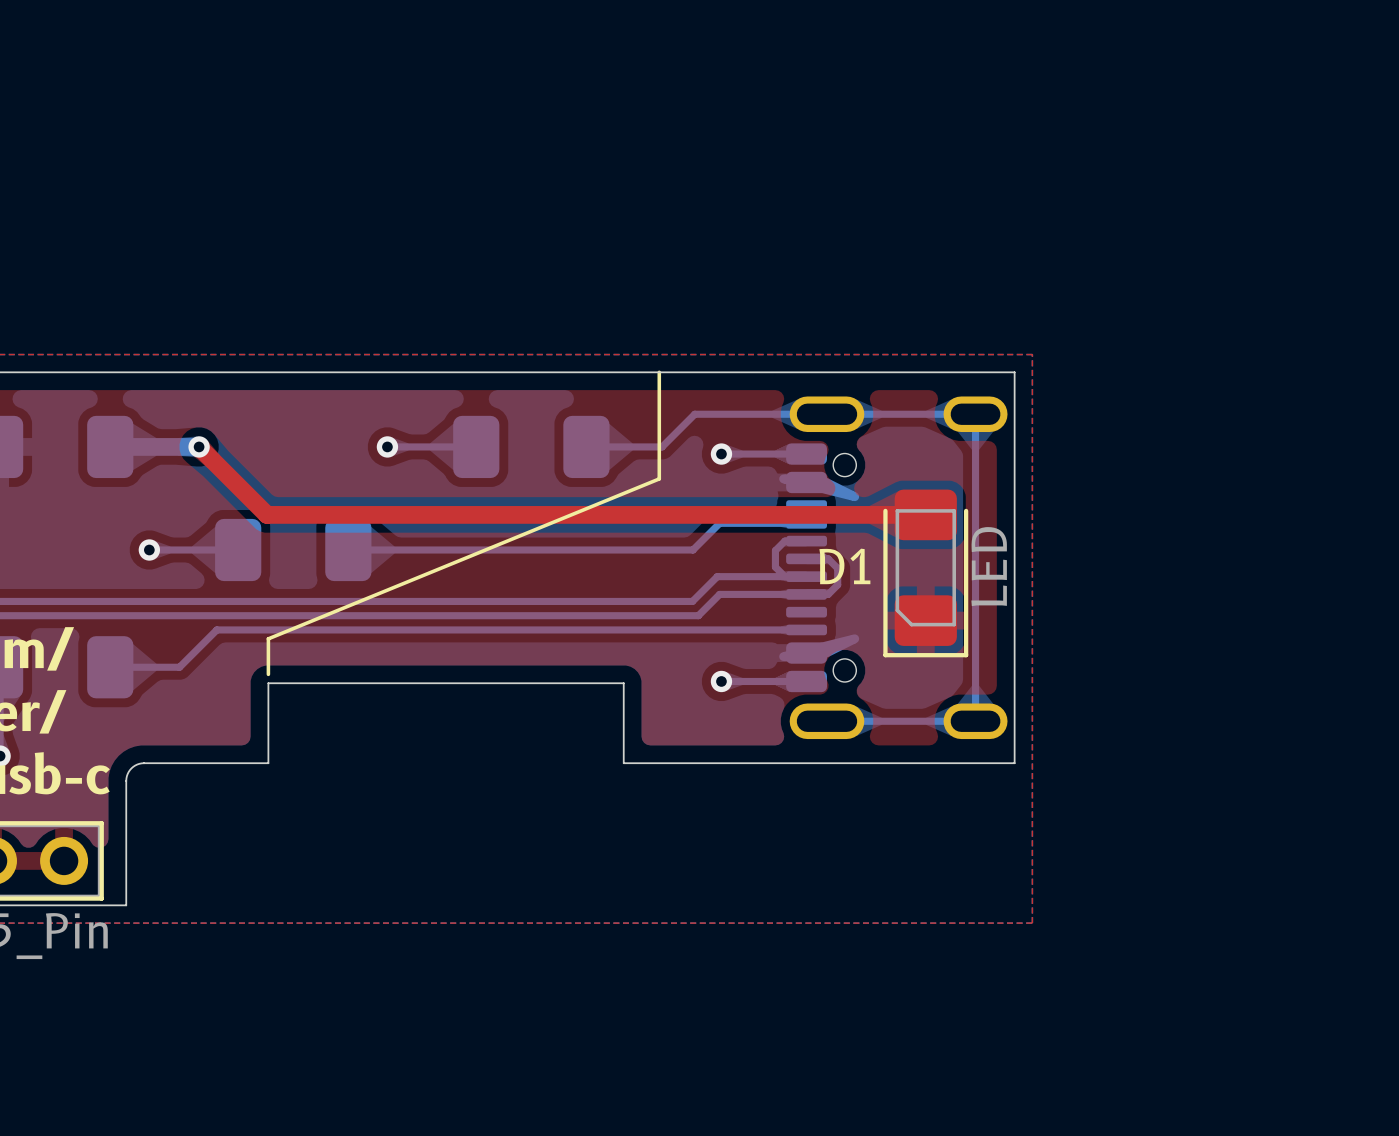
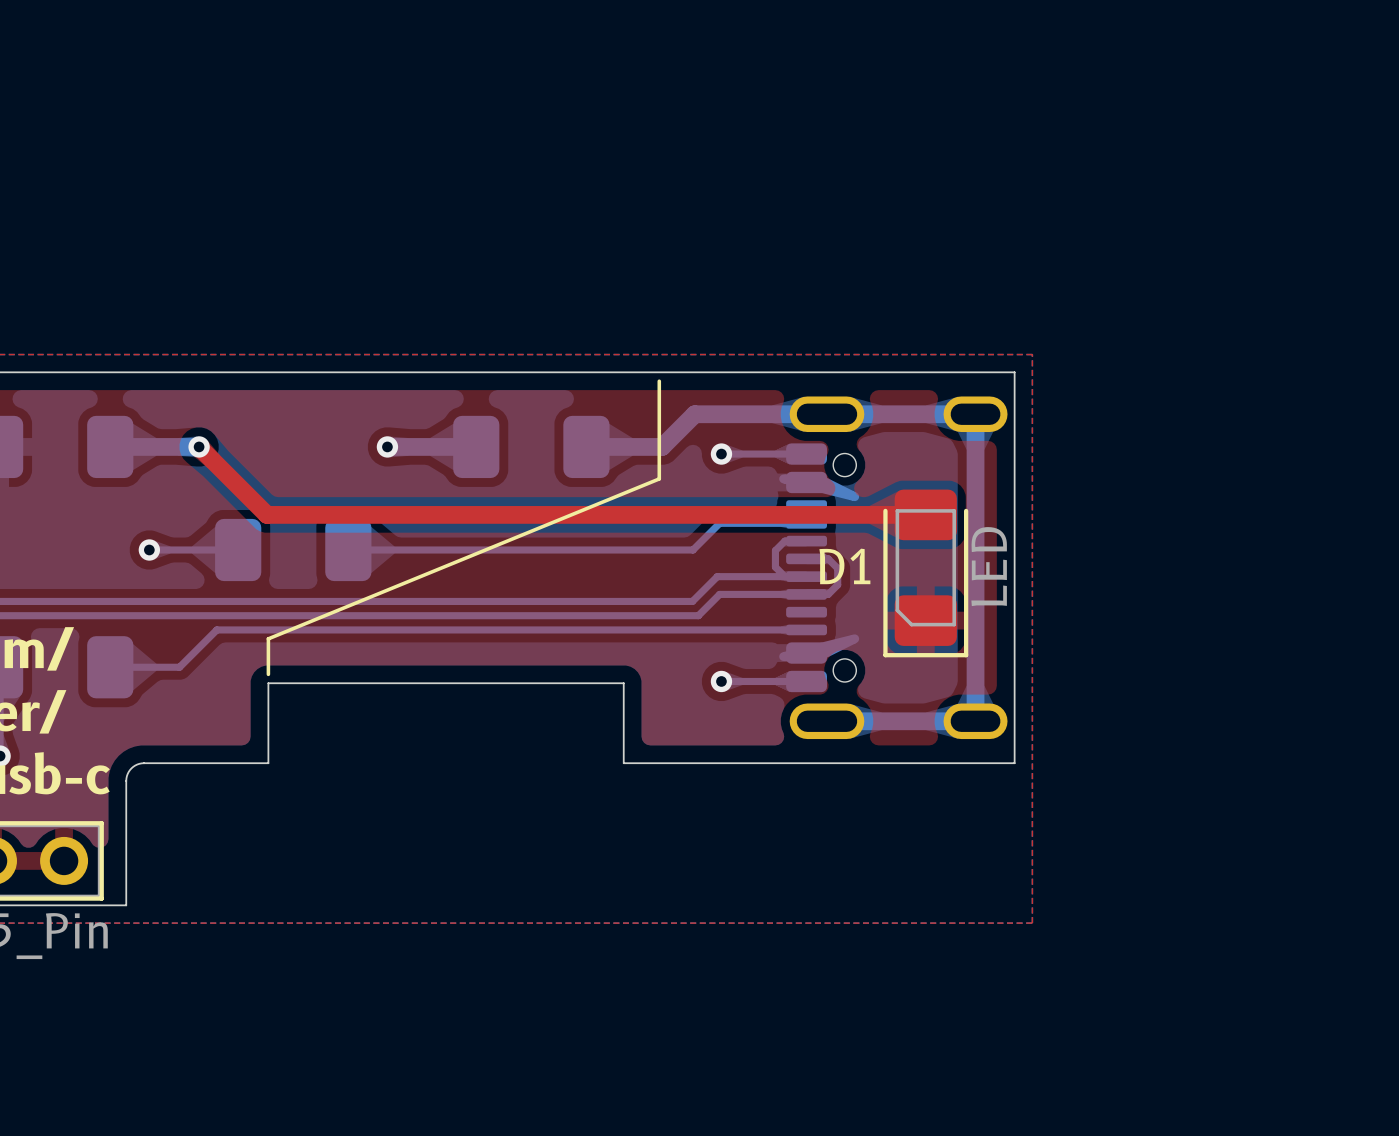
line: (659, 372) (659, 381) -> none
bottom track width: thin (387, 446) (476, 446) -> thick (387, 446) (476, 446)
bottom track width: thin (586, 446) (662, 446) (694, 414) (975, 414) (975, 721) (827, 721) -> thick (586, 446) (662, 446) (694, 414) (975, 414) (975, 721) (827, 721)

